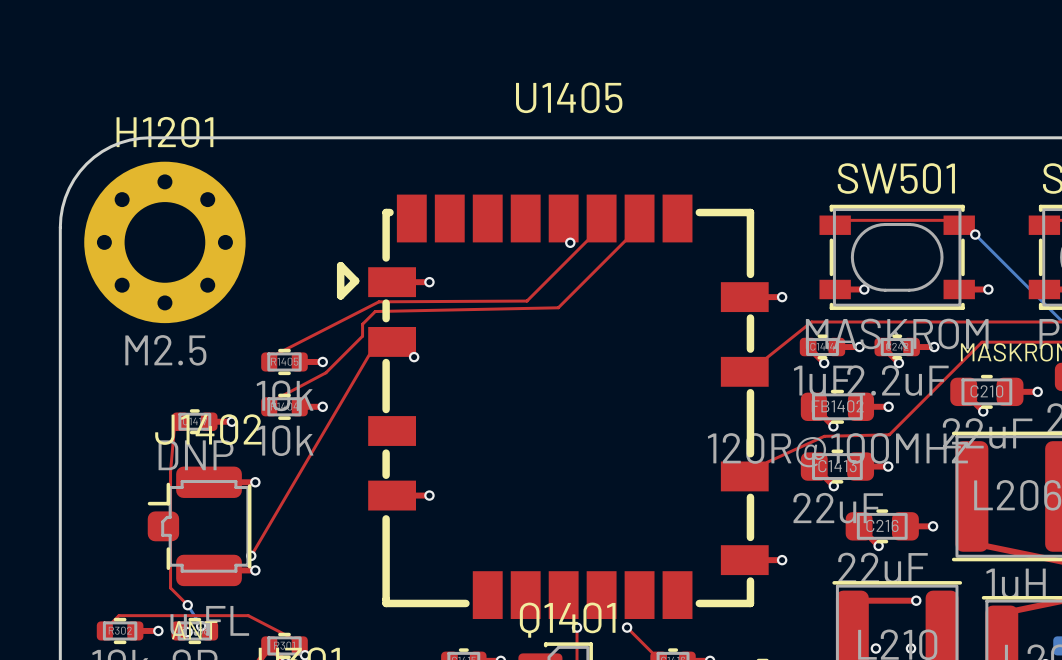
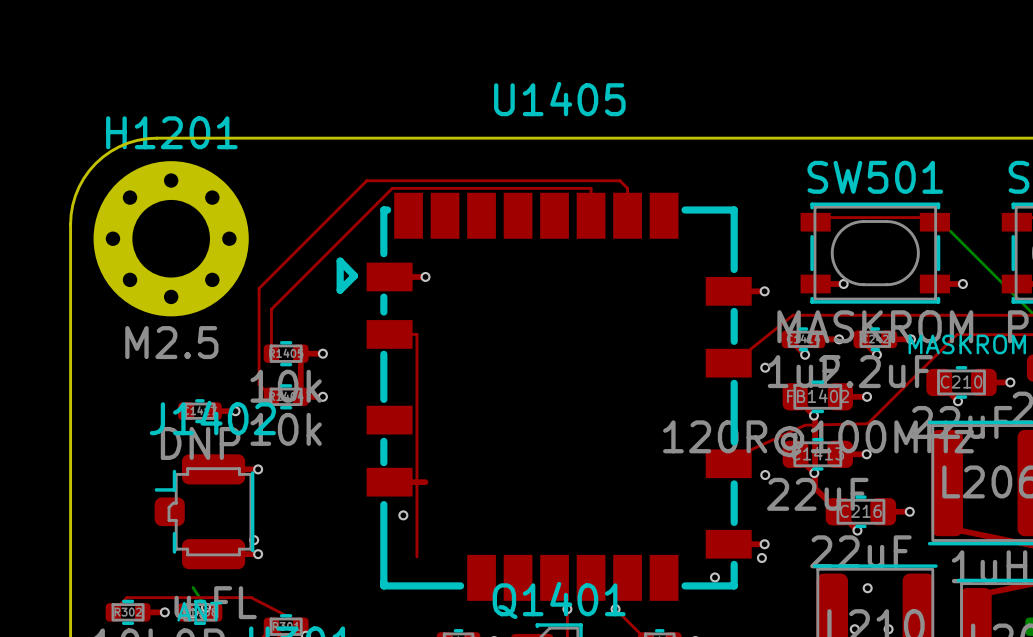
top track: none -> (591, 215) (591, 188) (392, 188) (271, 309) (271, 353)
top track: none -> (627, 215) (627, 188) (619, 180) (366, 180) (259, 288) (259, 384) (271, 396)
via: (975, 234) -> none
top track: (587, 240) (526, 301) (379, 301) (275, 354) -> none
top track: (625, 240) (558, 307) (375, 311) (362, 324) (362, 336) (325, 372) (275, 399) -> none
via: (570, 242) -> none
top track: none -> (389, 334) (416, 334) (416, 556)
top track: (369, 354) (251, 555) -> none
via: (414, 357) -> none
top track: none -> (300, 353) (300, 396)
via: none -> (765, 367)
top track: none -> (813, 415) (815, 488) (838, 511)
top track: (174, 428) (170, 472) (170, 512) -> none
via: none -> (765, 475)
via position: (429, 495) -> (403, 515)
top track: (170, 539) (170, 587) (187, 605) -> none
via: none -> (761, 557)
via: none -> (714, 577)
top track: (866, 600) (916, 600) -> none
via position: (916, 600) -> (867, 588)
via: (187, 605) -> none

